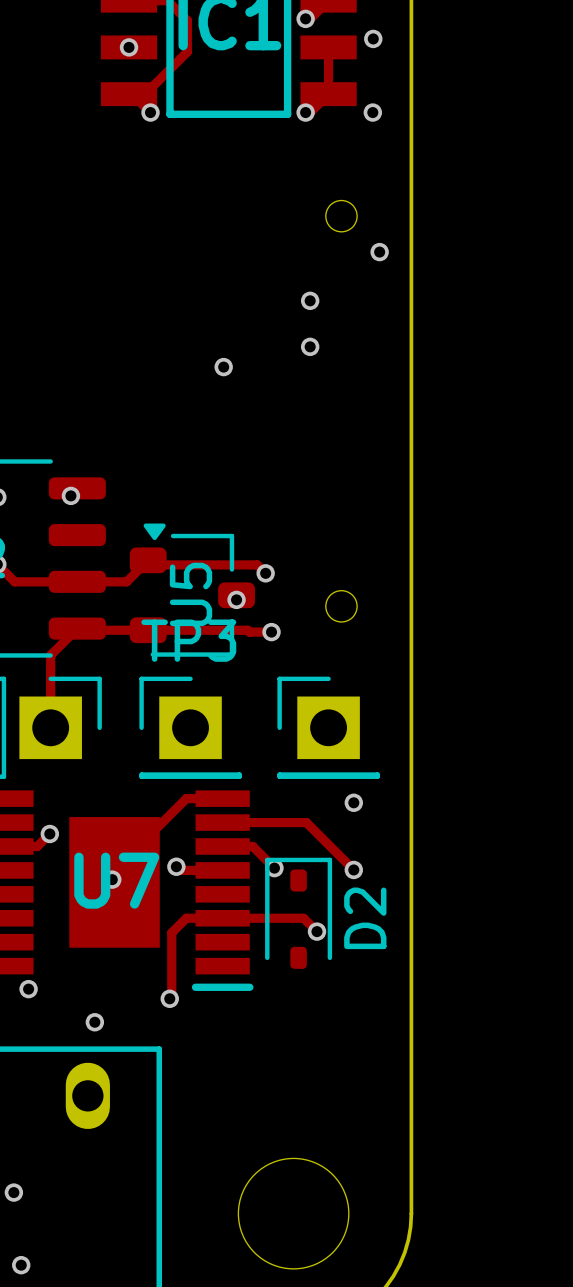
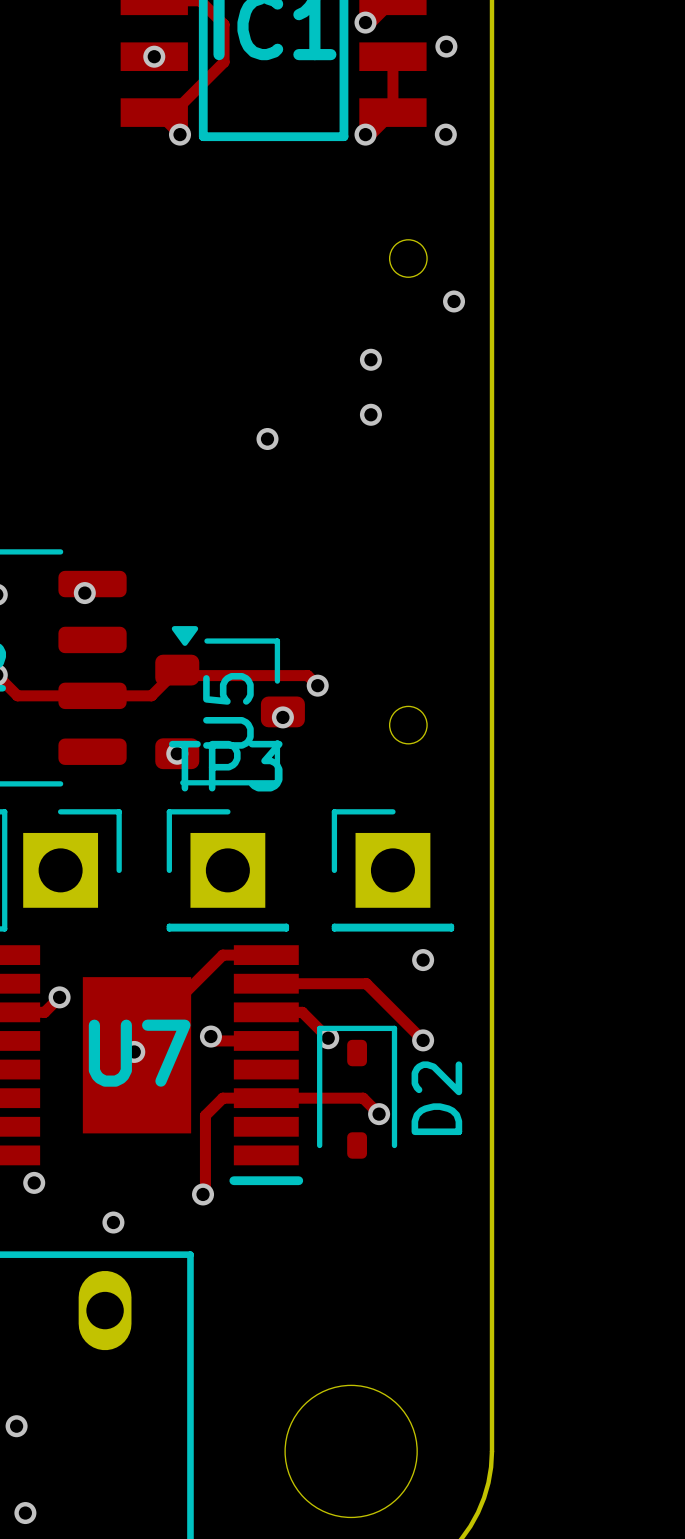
track: (271, 632) (249, 632) (247, 630) (79, 630) (77, 628) (50, 655) (50, 727) -> none
via position: (271, 632) -> (177, 753)

